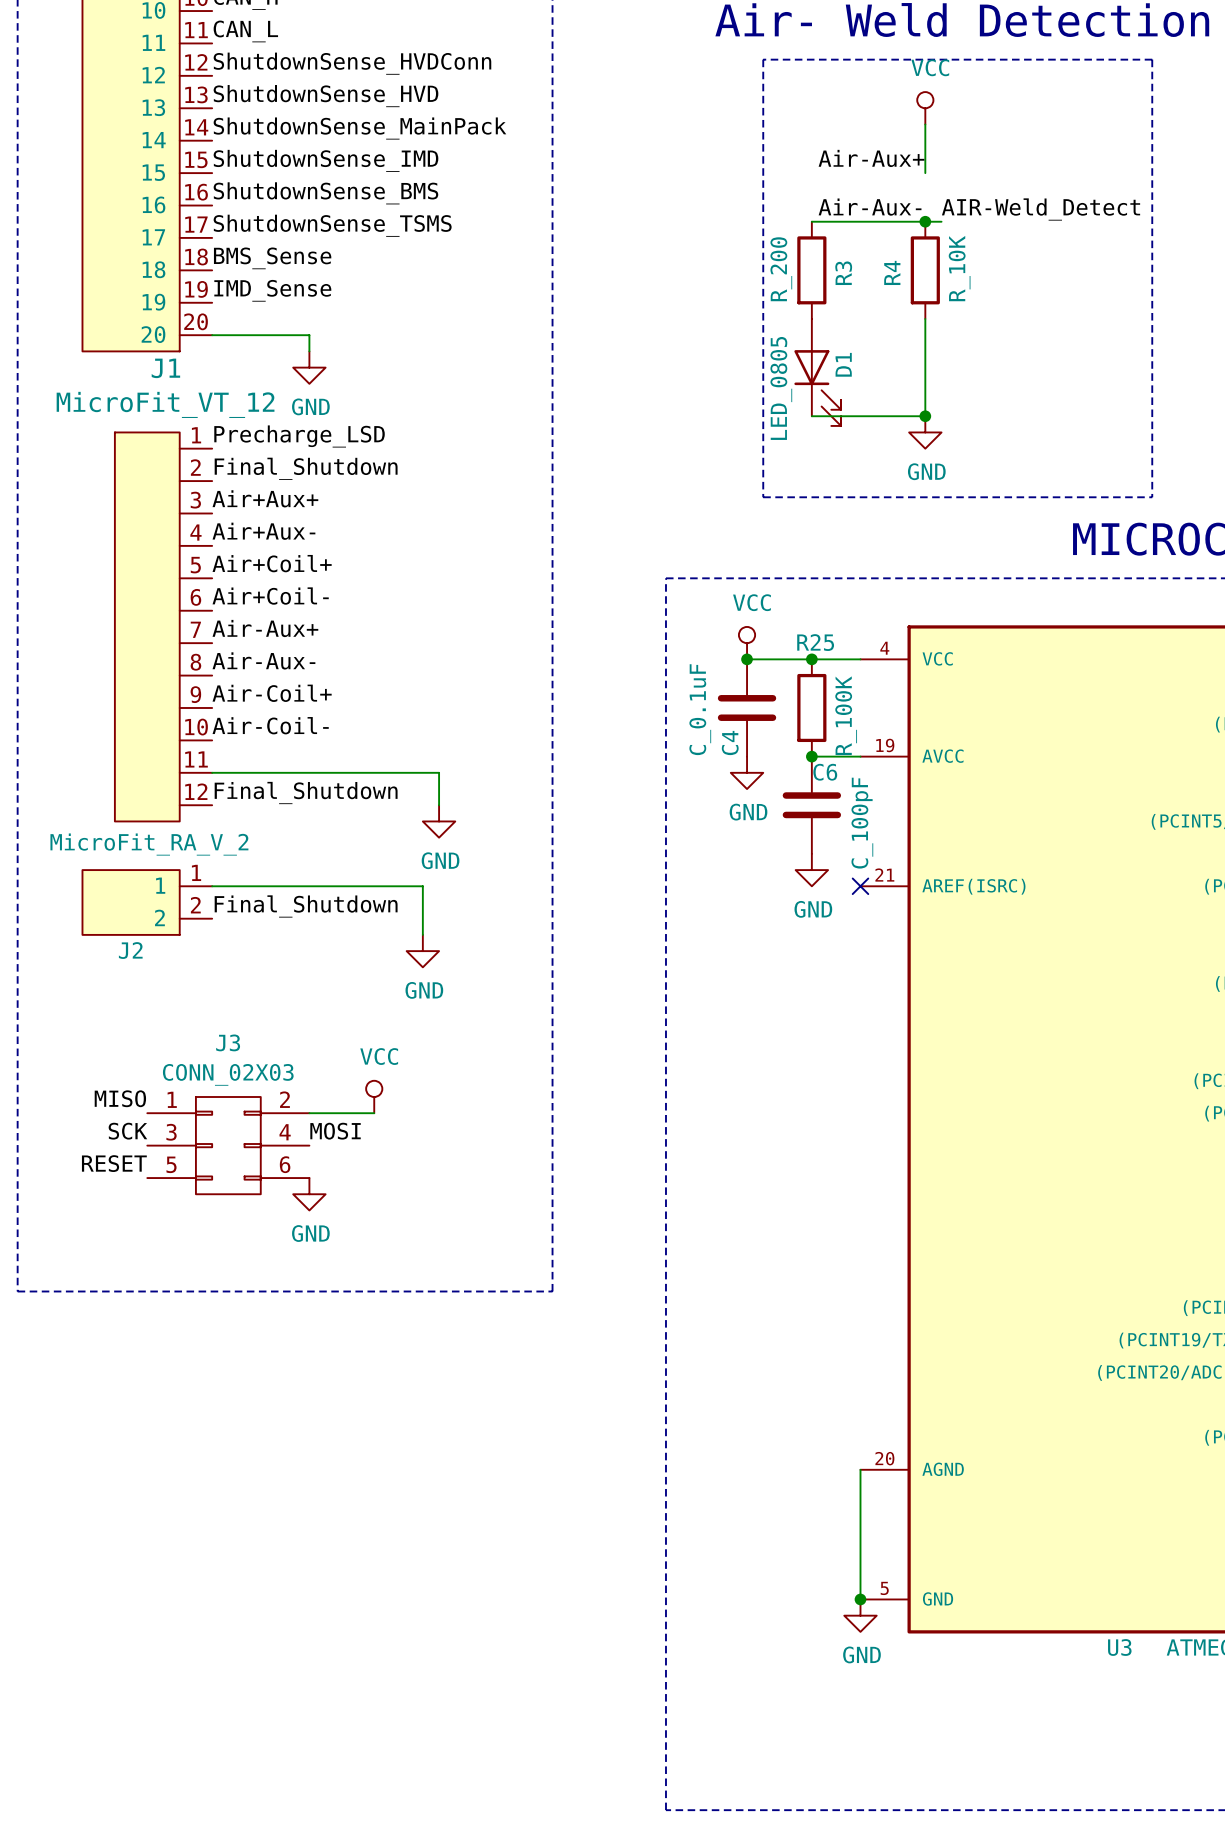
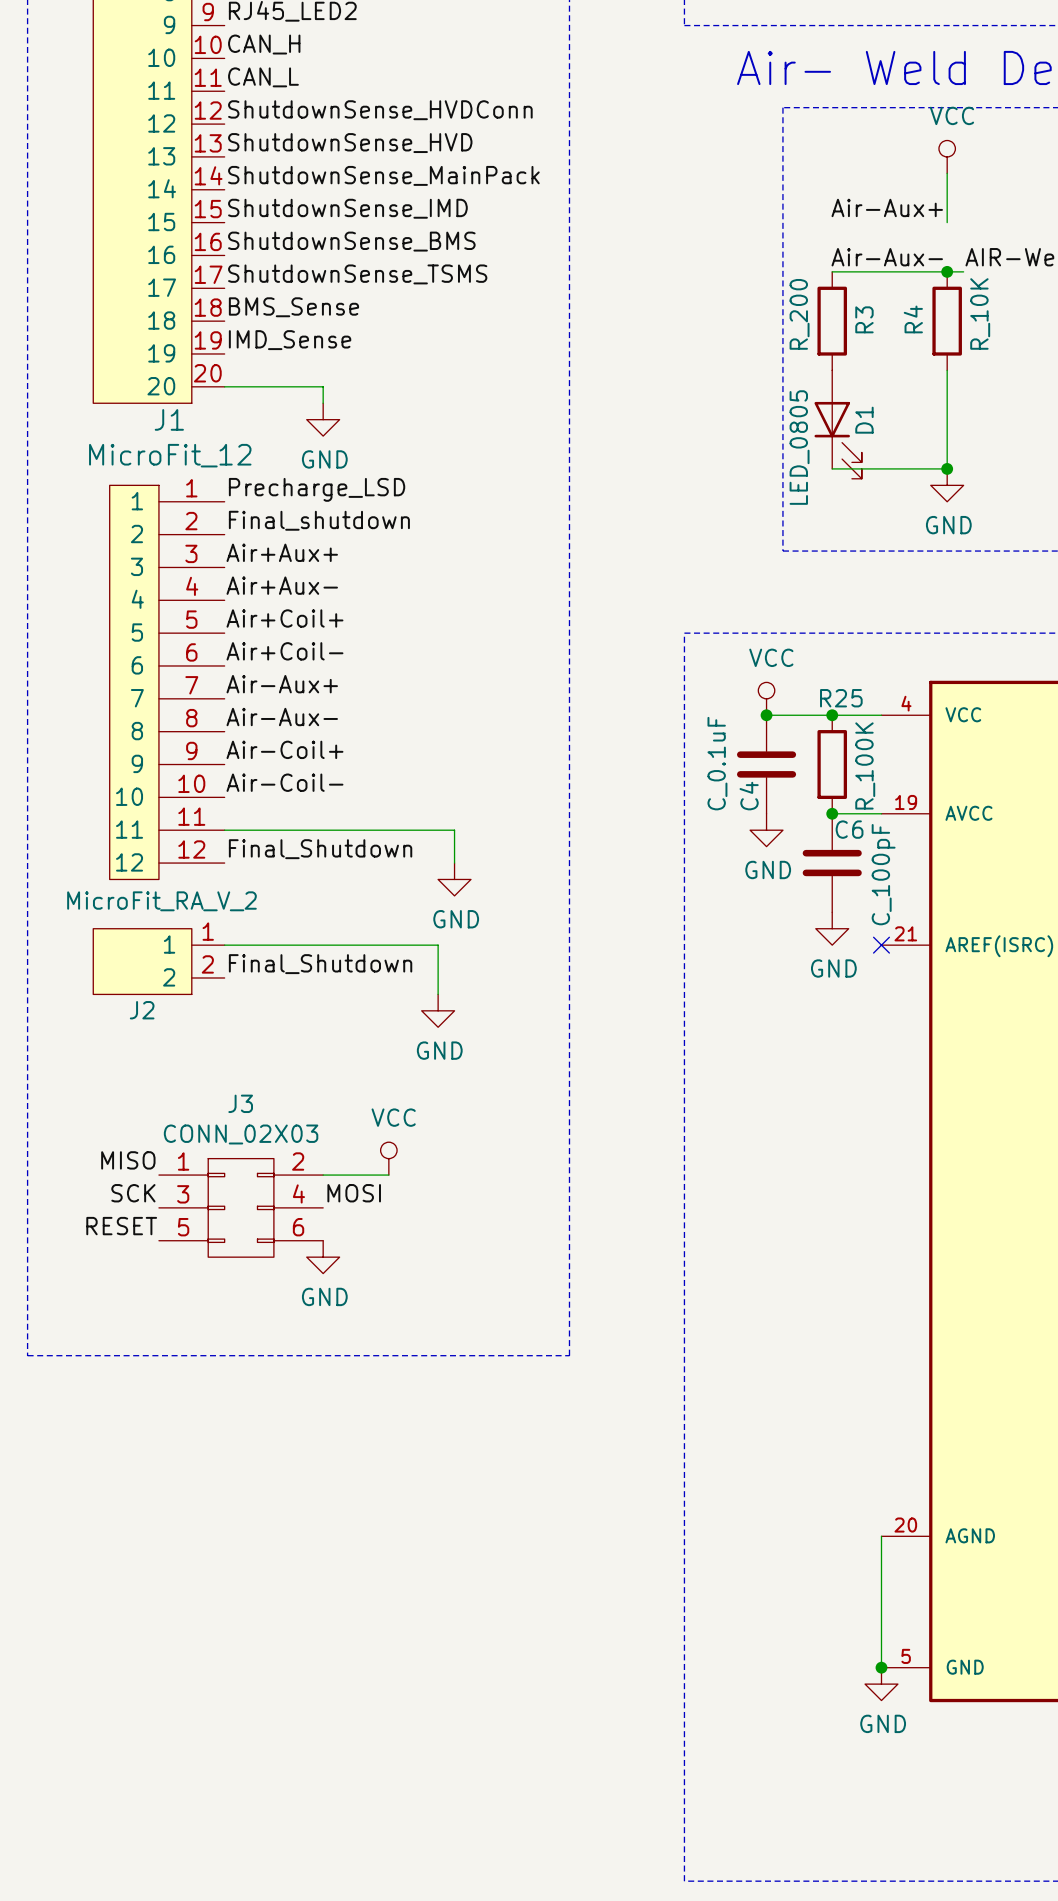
J1 value: MicroFit_VT_12 (165, 404) -> MicroFit_12 (170, 455)
J1 symbol: [114, 432, 213, 822] -> [109, 485, 225, 880]
label: Final_Shutdown (306, 468) -> Final_shutdown (319, 520)

